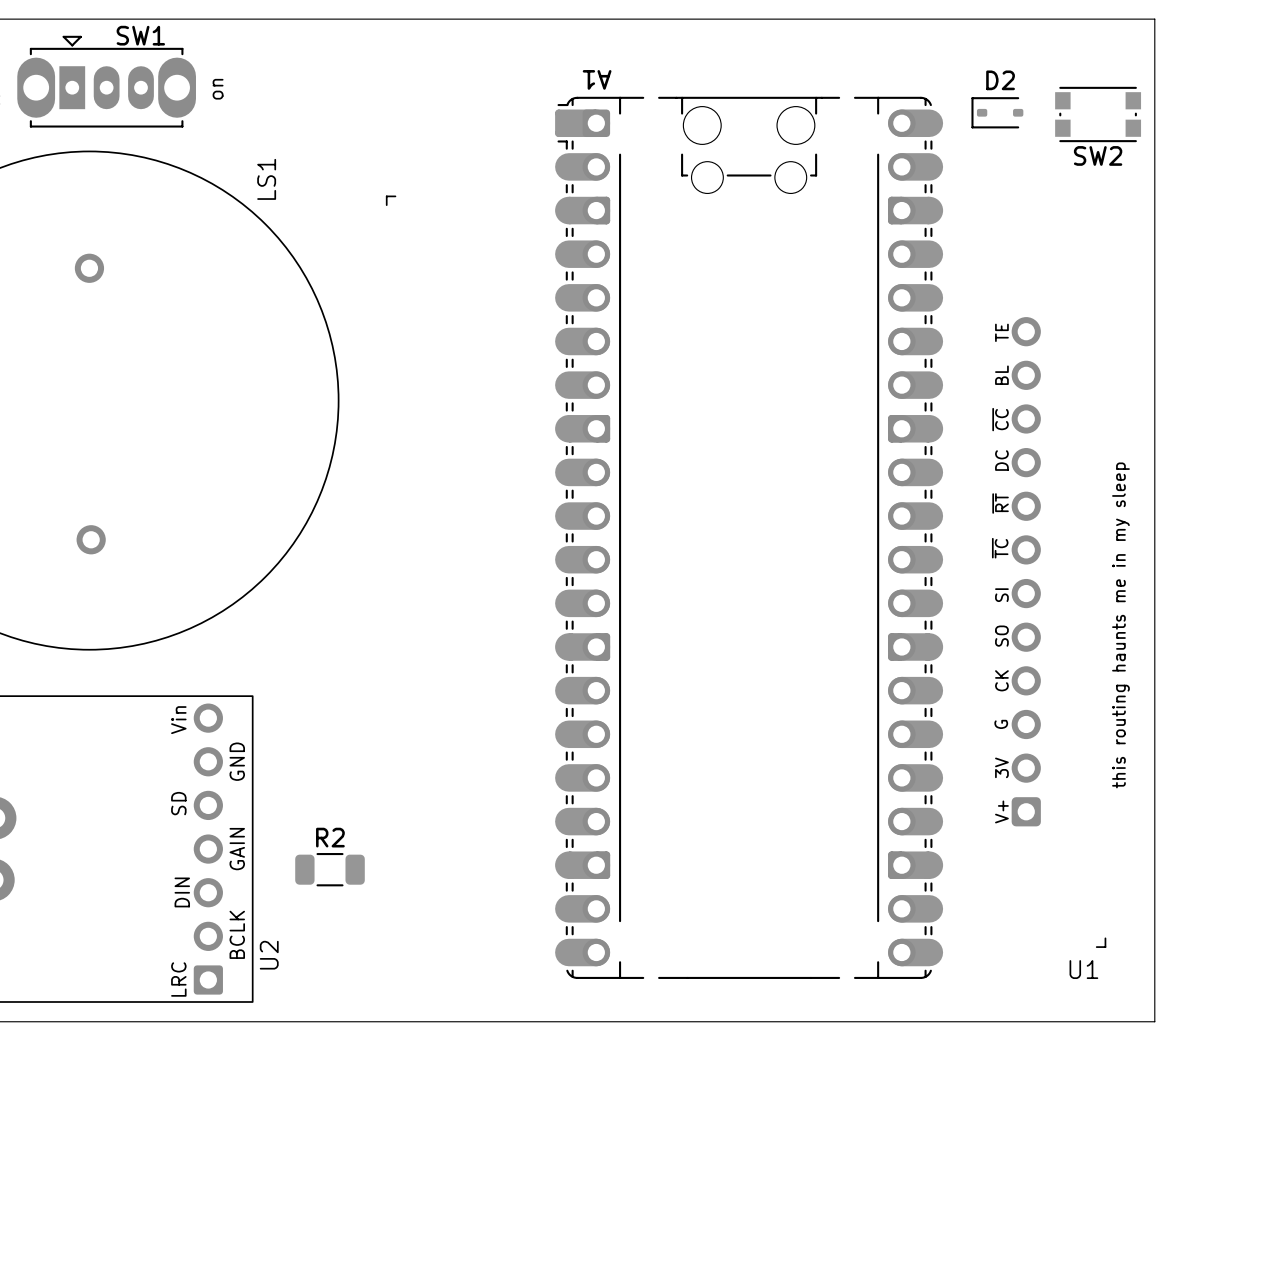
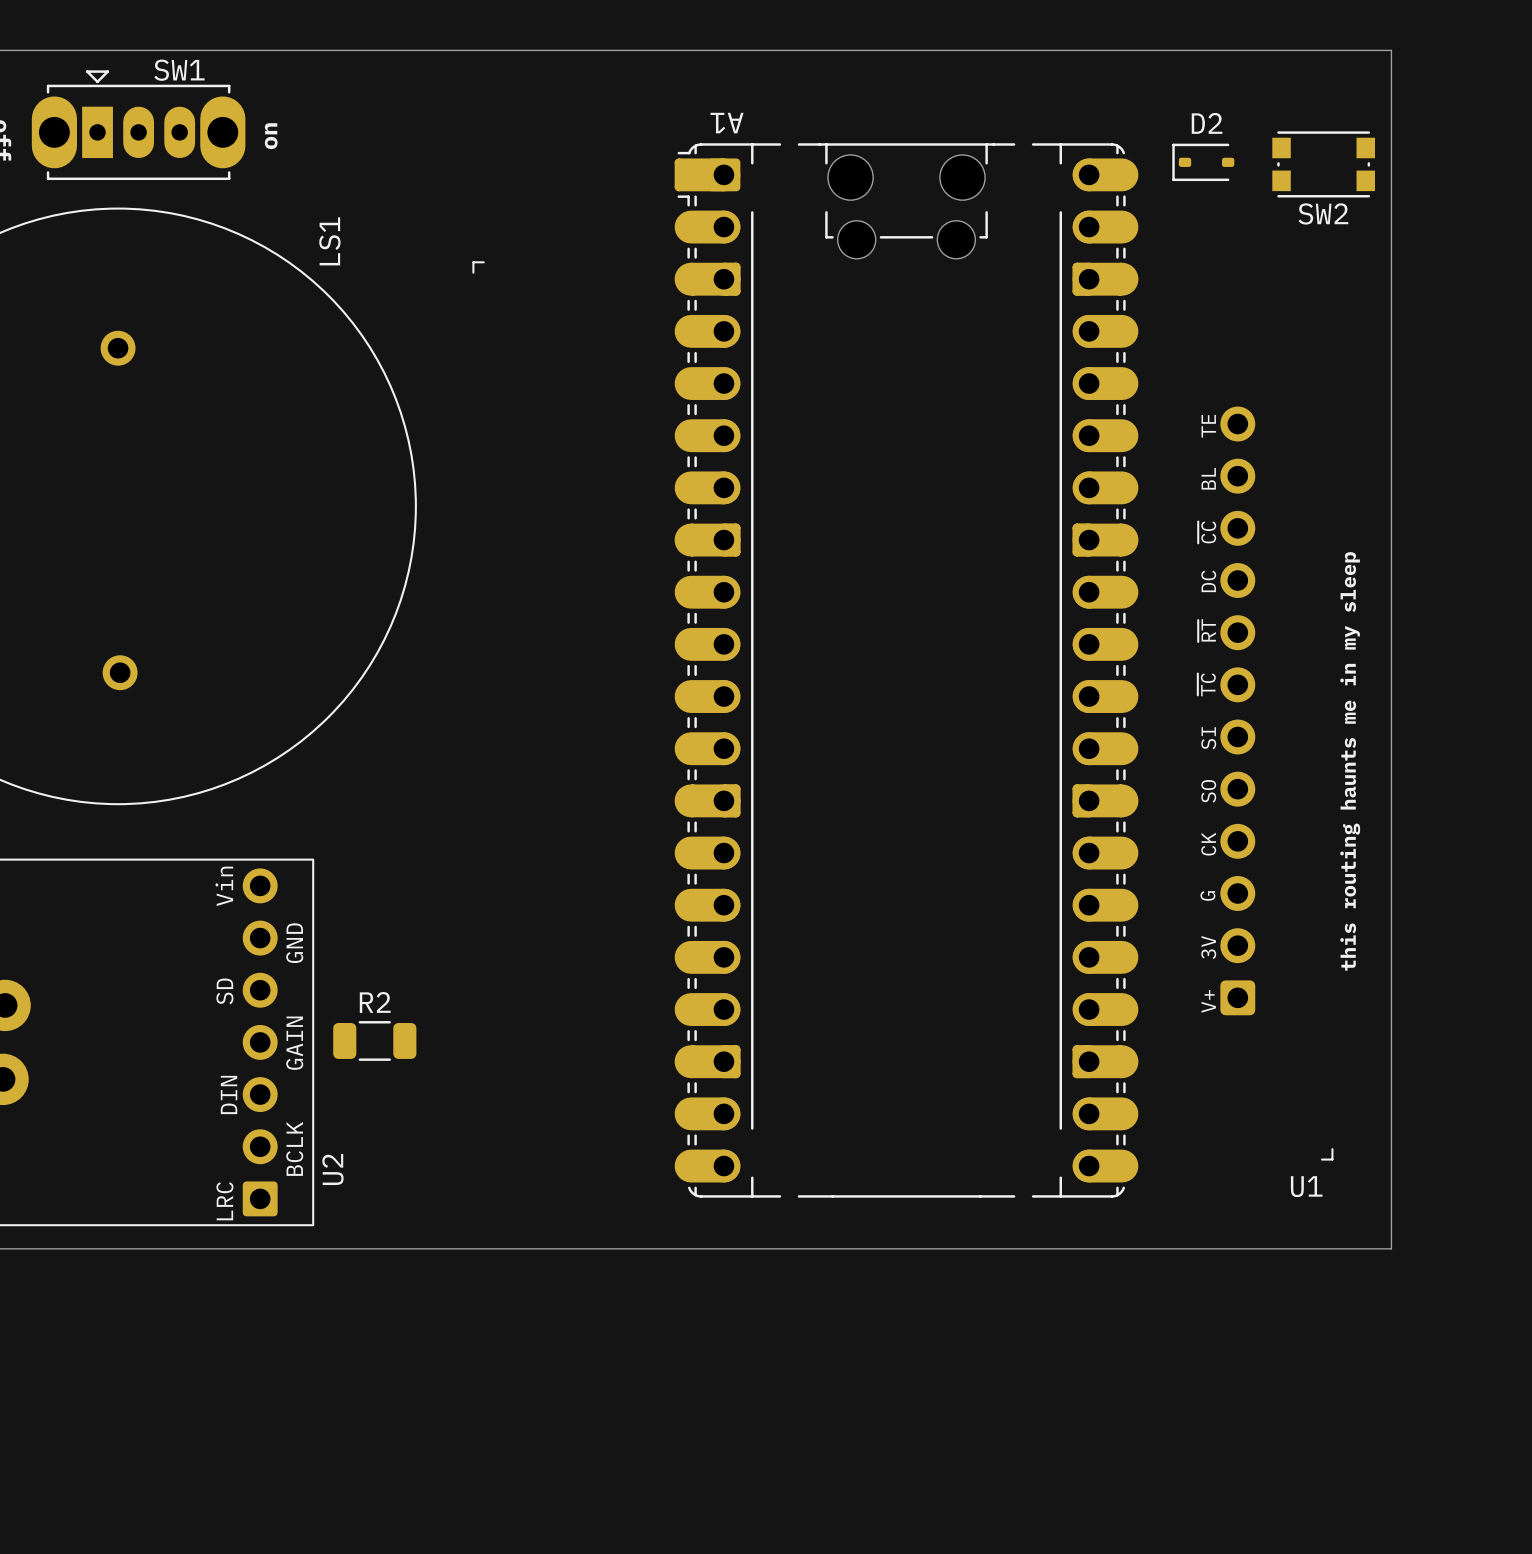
R2 position: (330, 869) -> (374, 1040)

